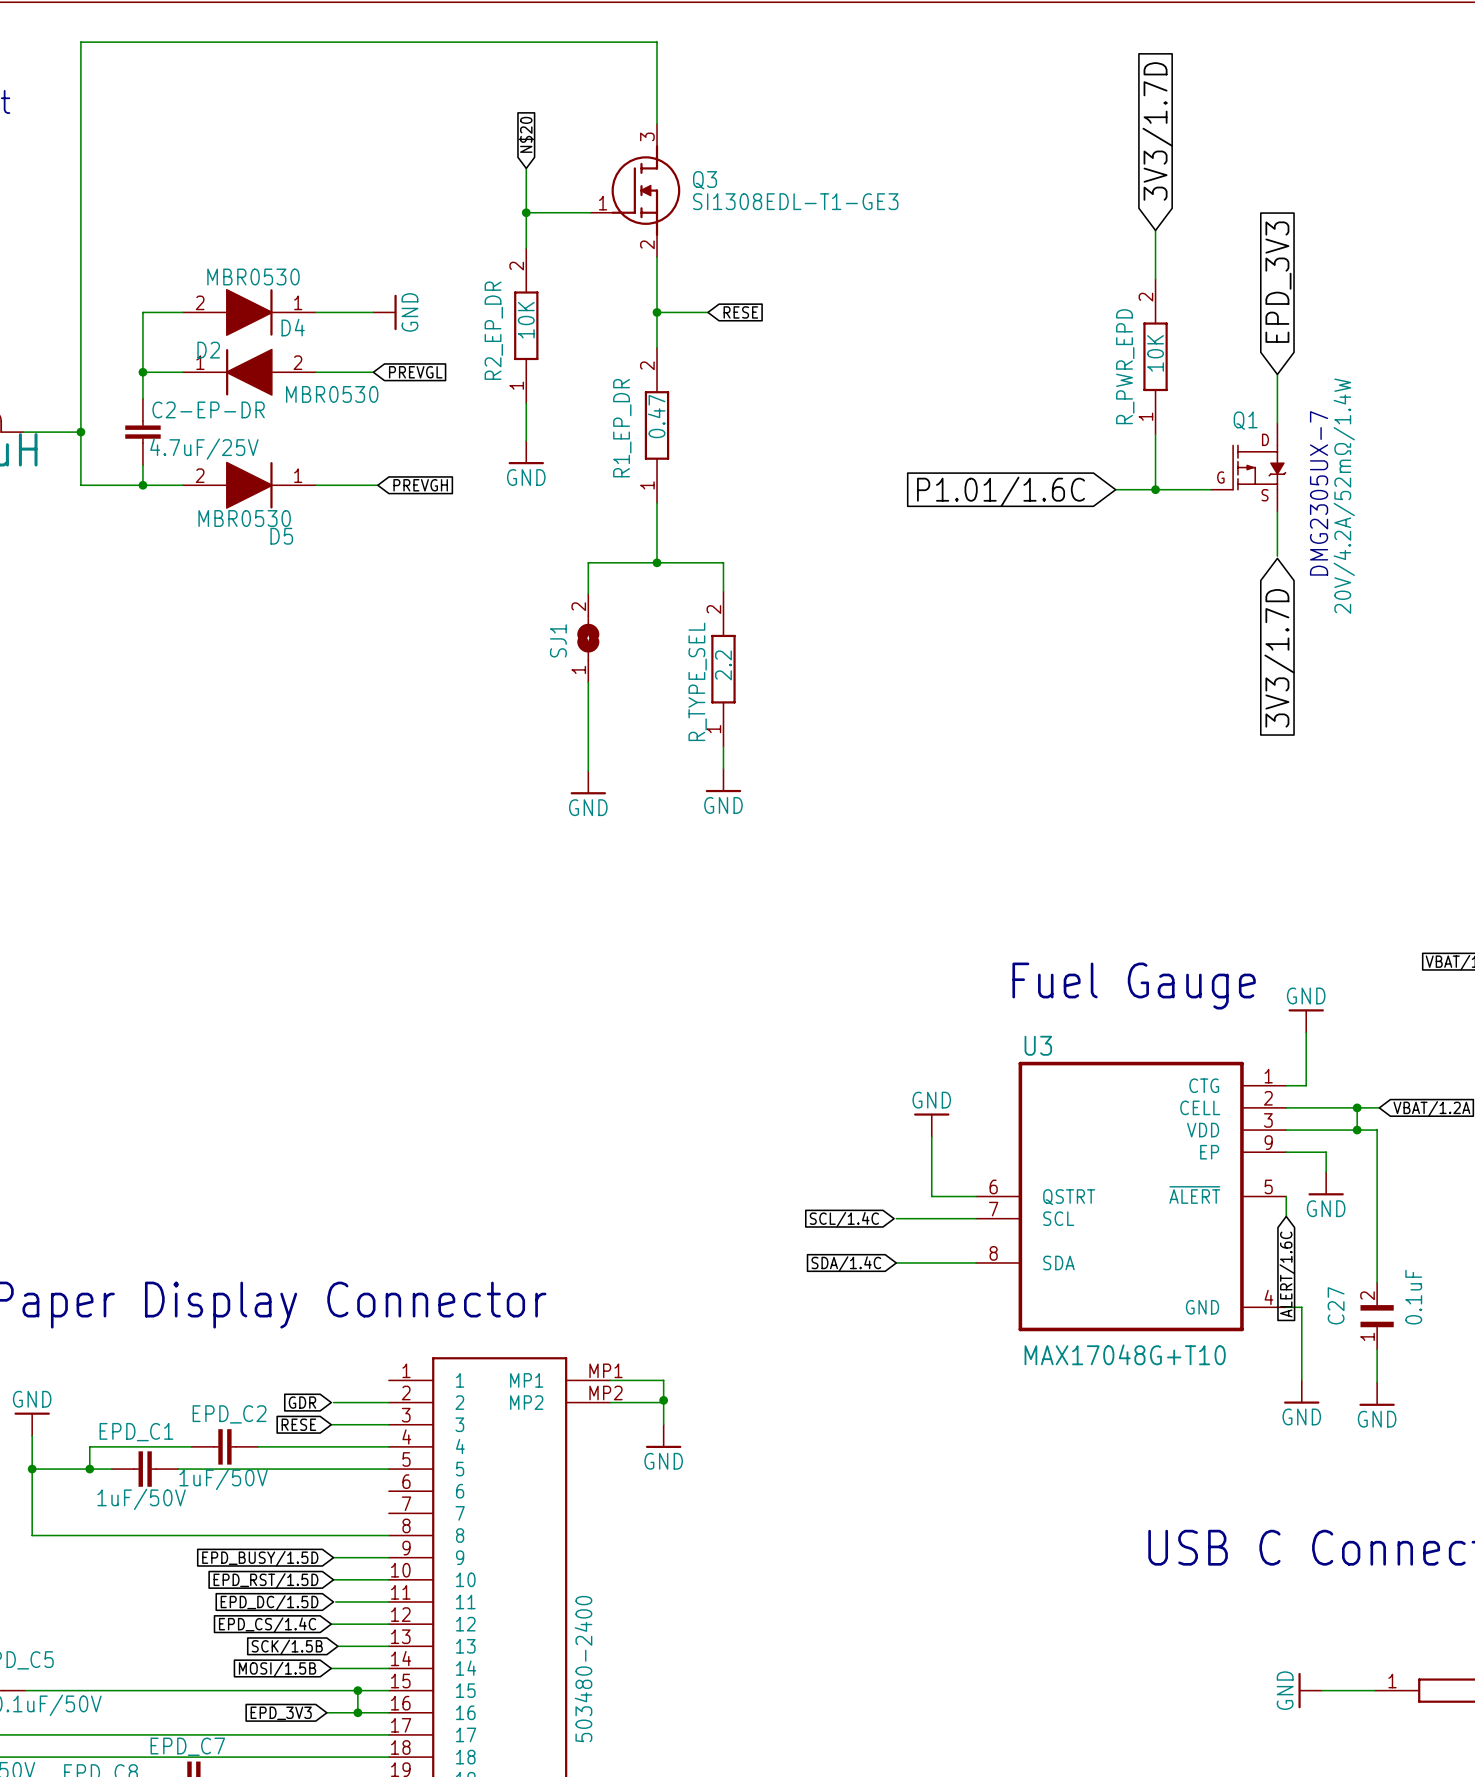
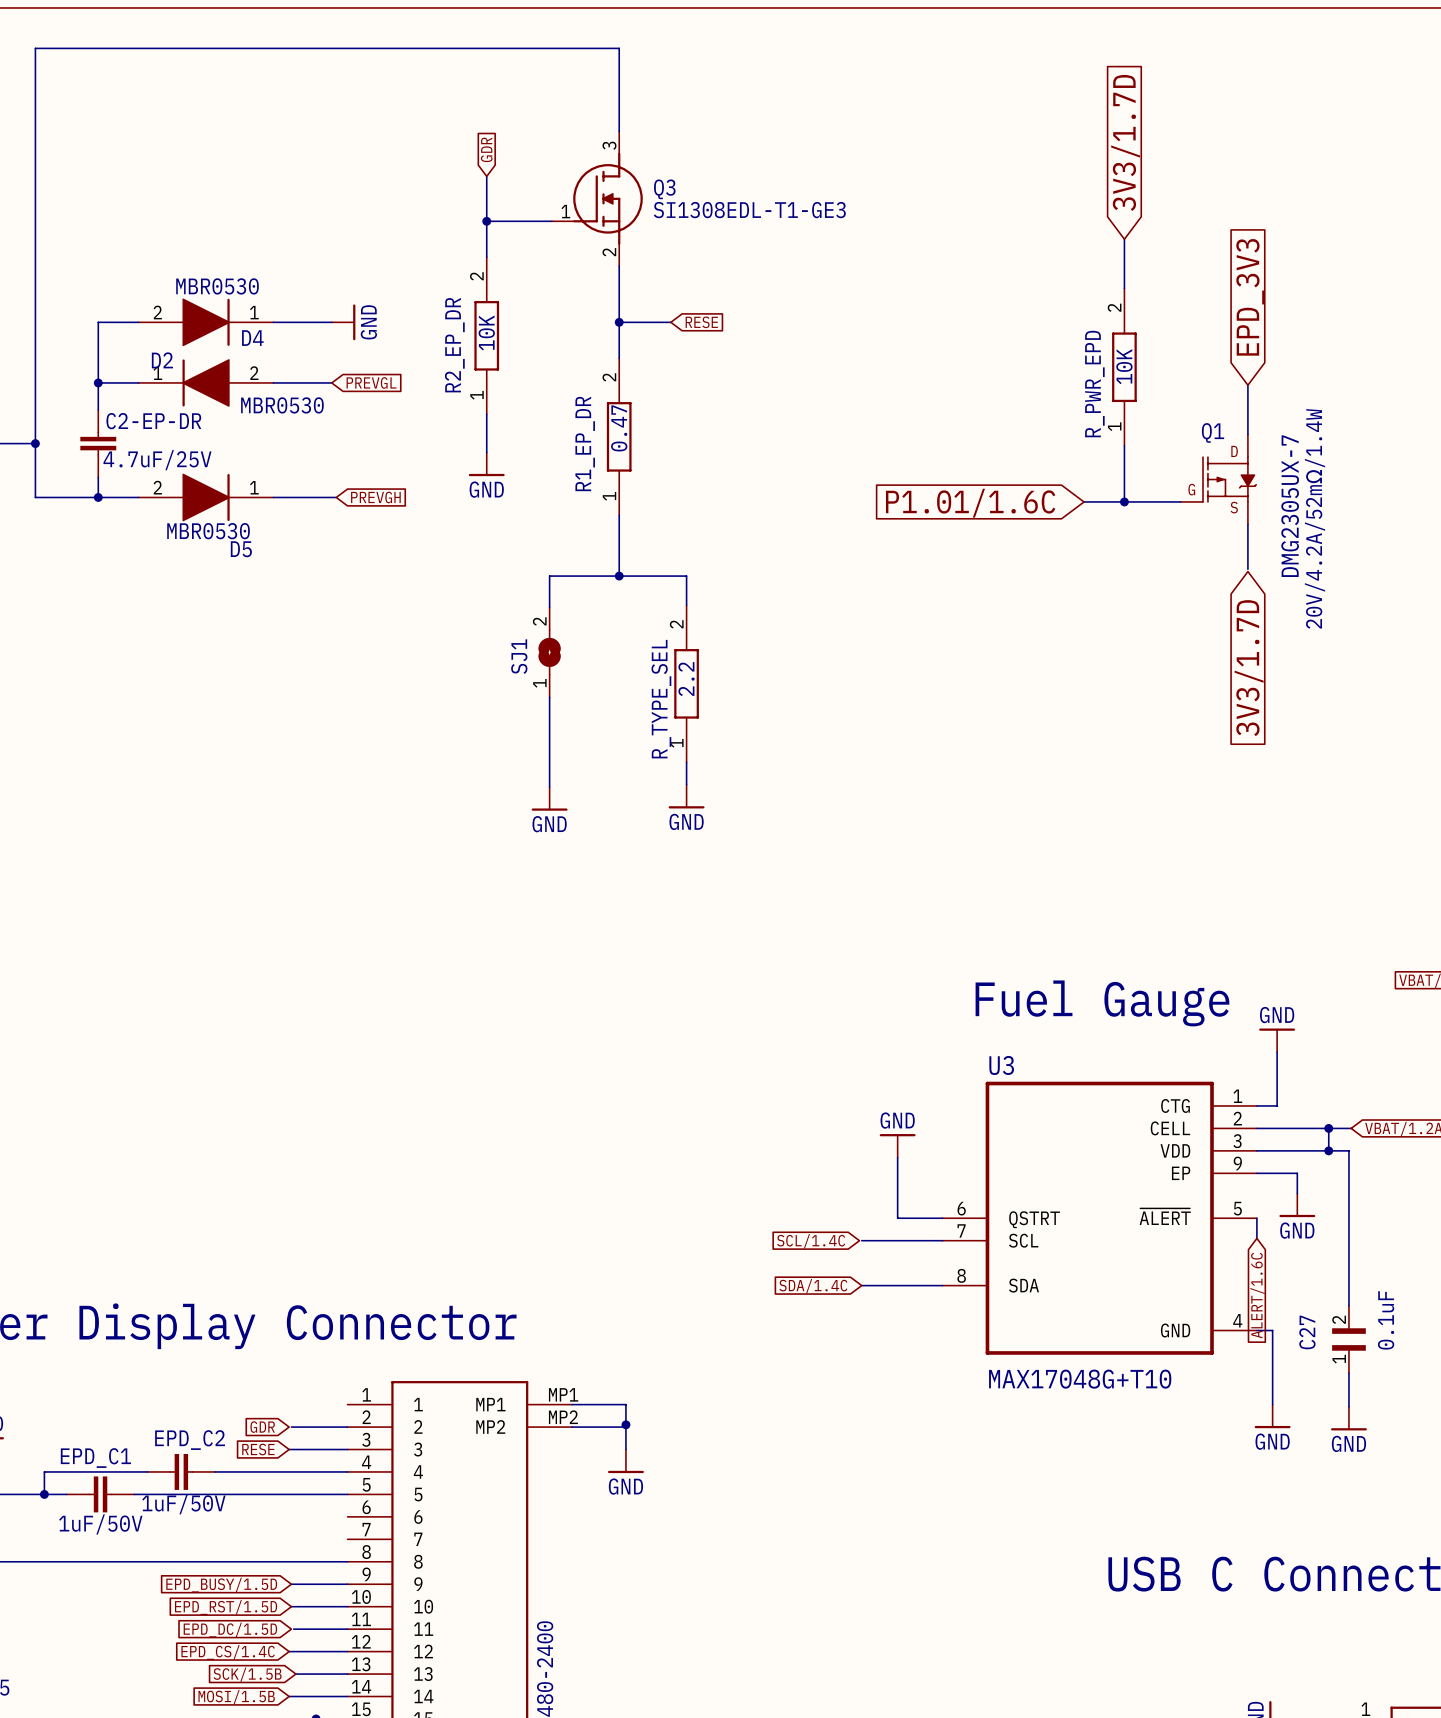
global label: N$20 (526, 134) -> GDR (486, 149)

